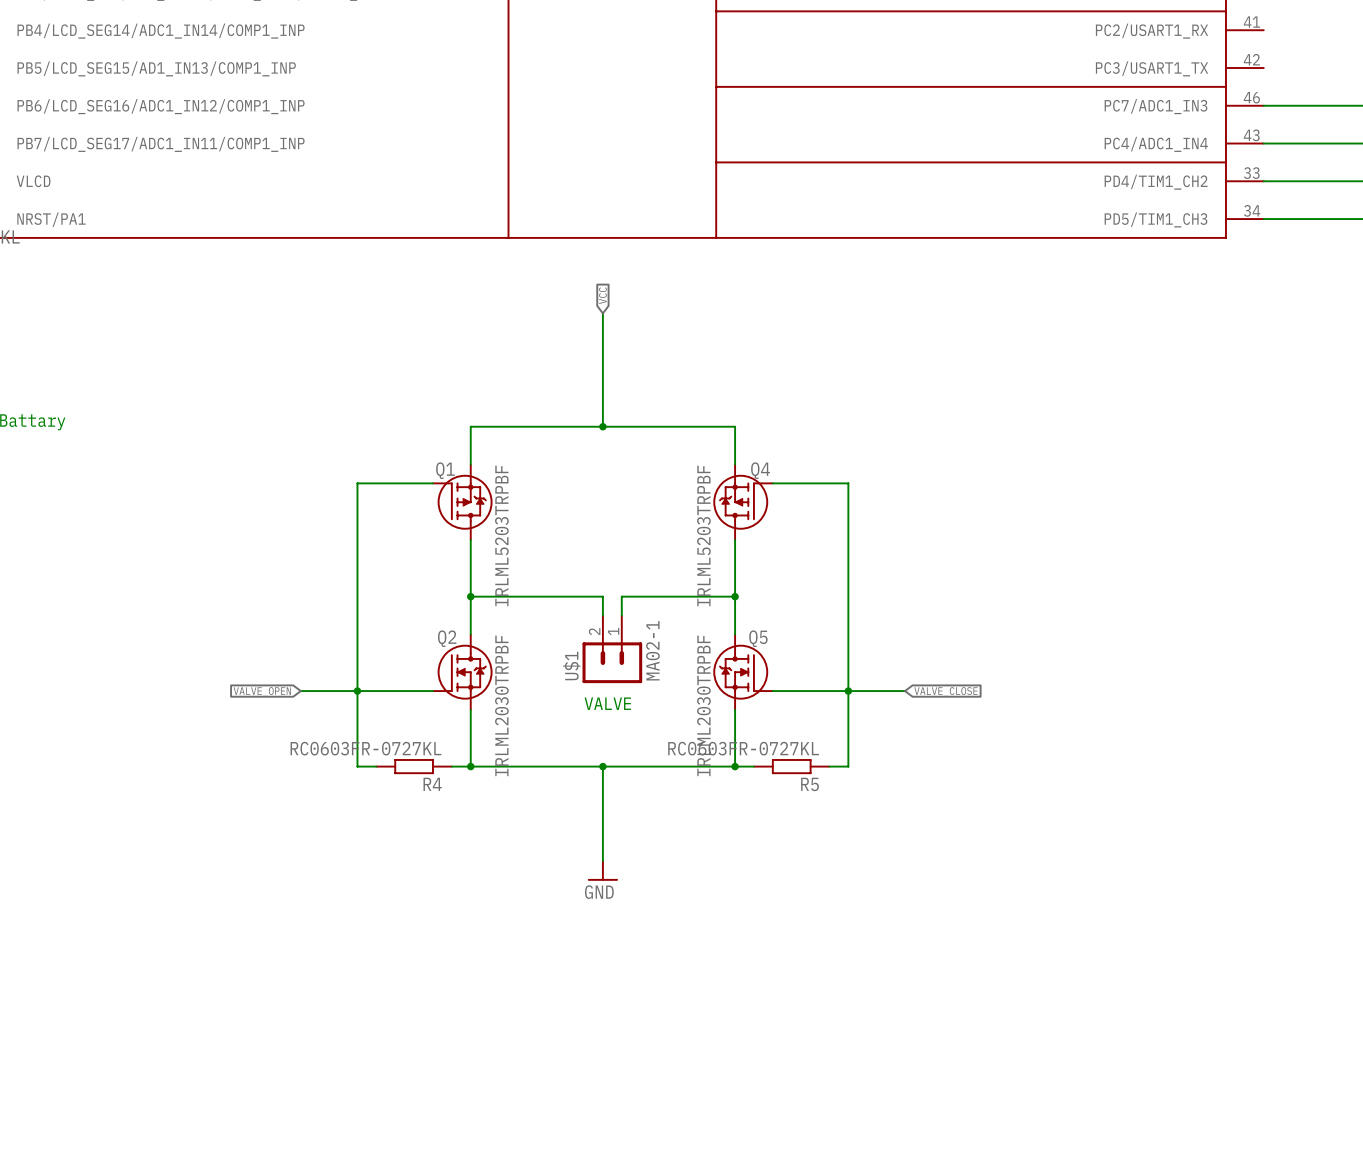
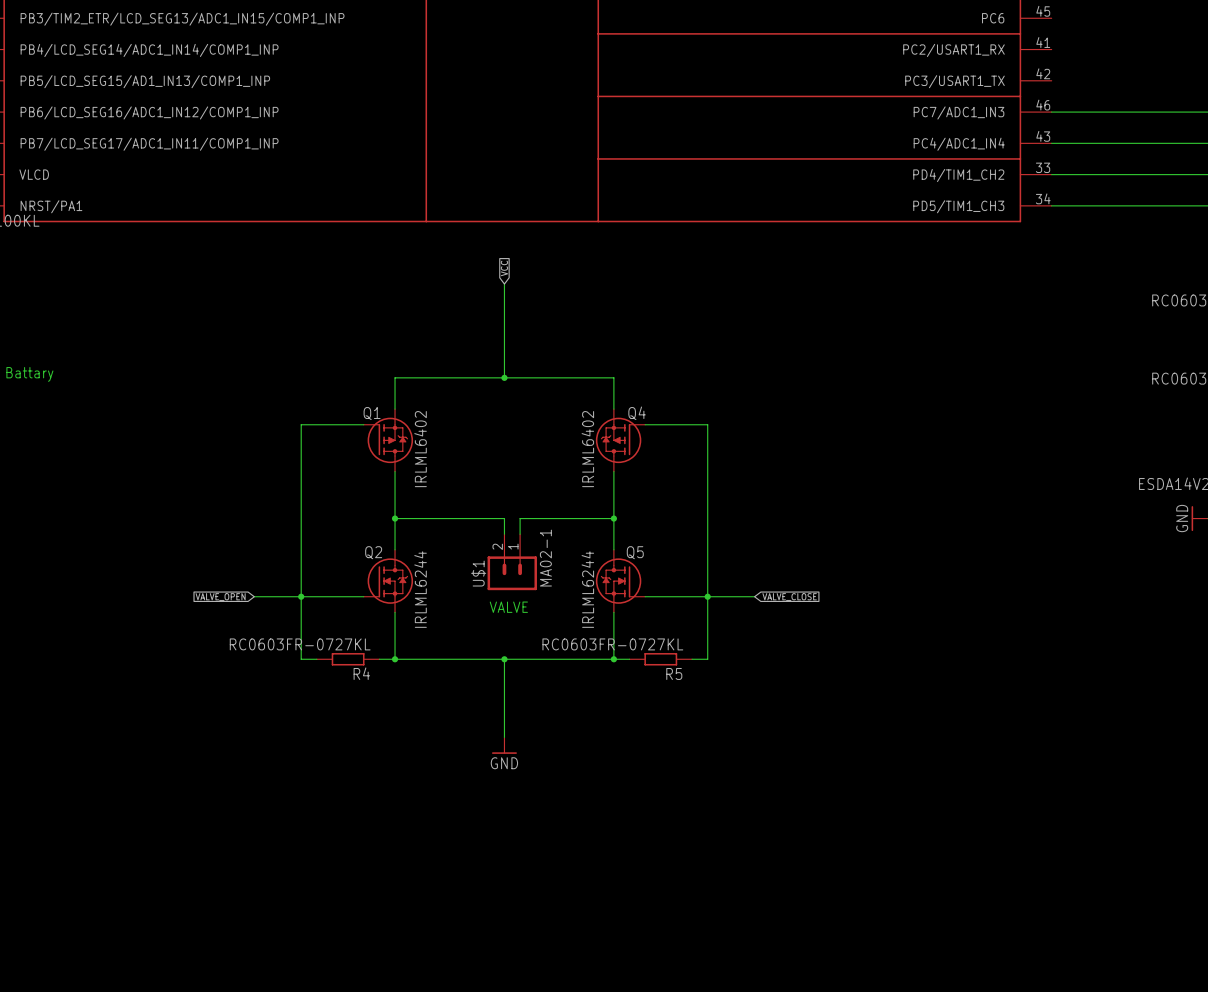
Q1 value: IRLML5203TRPBF (501, 535) -> IRLML6402 (420, 449)
Q4 value: IRLML5203TRPBF (703, 535) -> IRLML6402 (587, 449)
Q2 value: IRLML2030TRPBF (501, 705) -> IRLML6244 (420, 589)
Q5 value: IRLML2030TRPBF (703, 705) -> IRLML6244 (587, 589)

